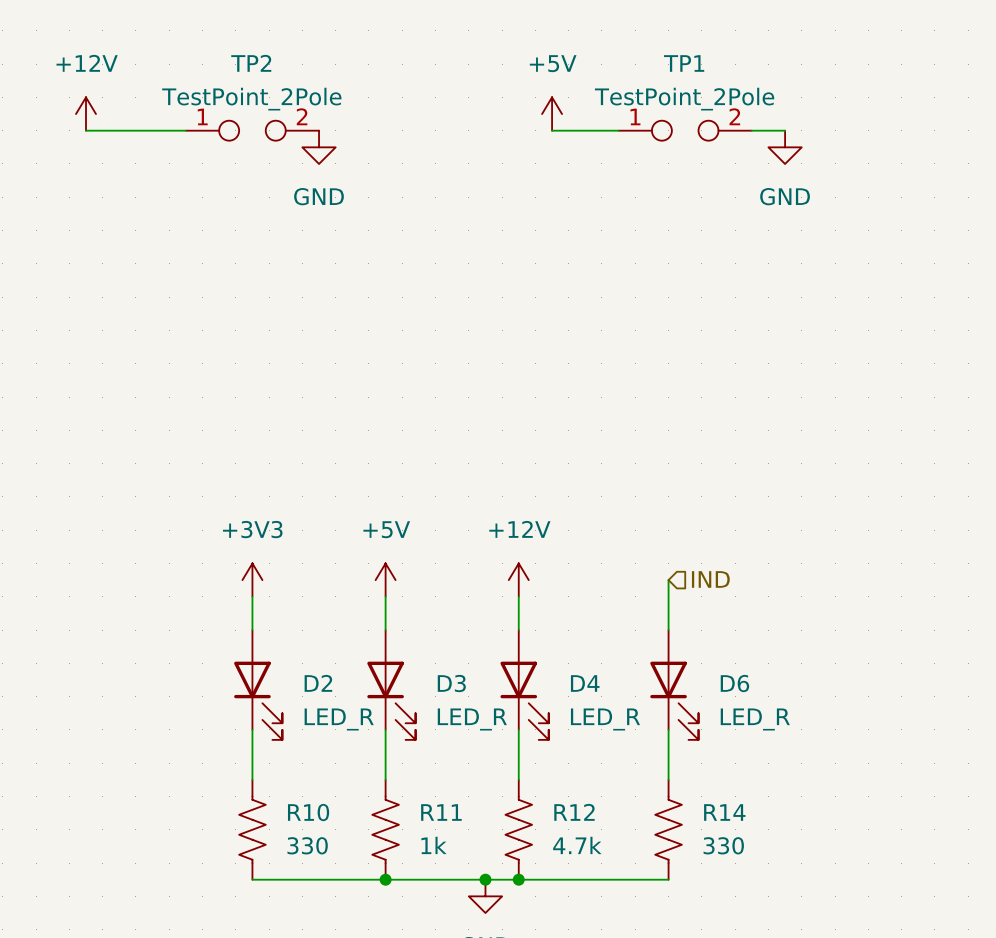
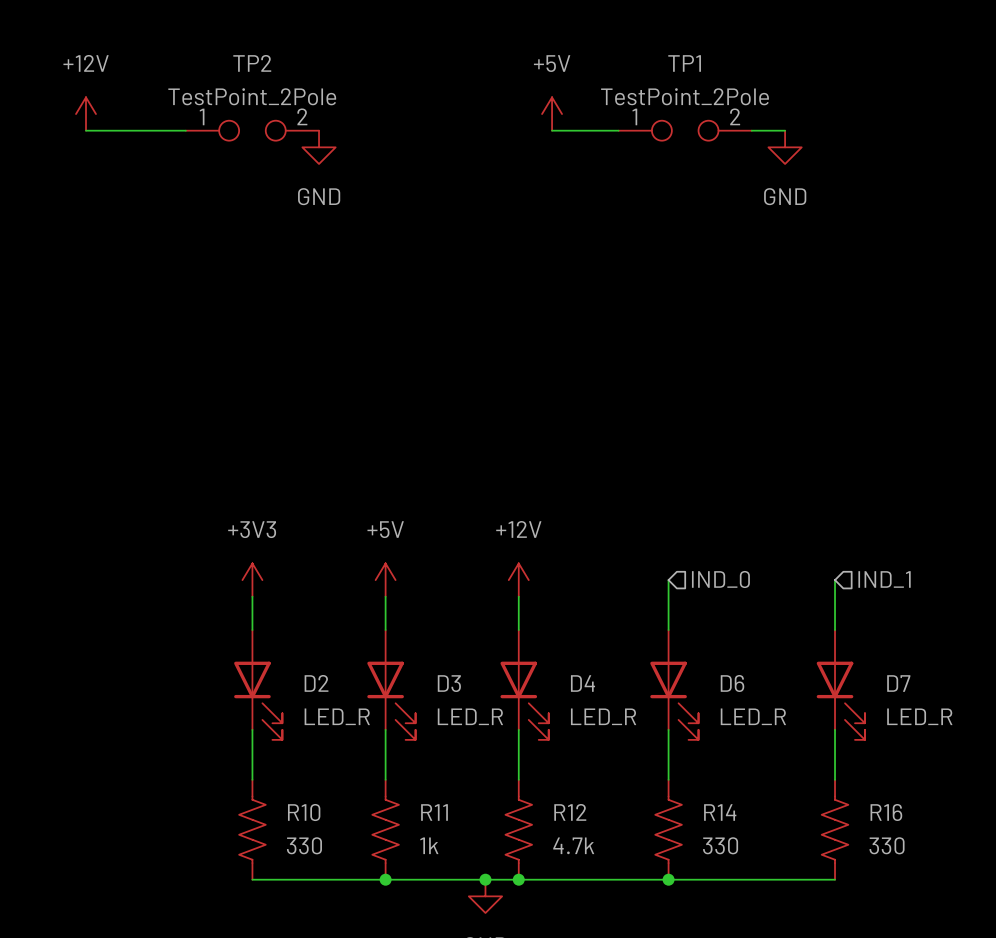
hierarchical label: IND (710, 579) -> IND_0 (720, 579)
wire: none -> (835, 580) (835, 630)
hierarchical label: none -> IND_1 (884, 579)
D7: none -> LED_R (840, 684)
wire: none -> (835, 729) (835, 779)
R16: none -> 330 (835, 829)
wire: none -> (668, 879) (835, 879)
junction: none -> (668, 879)

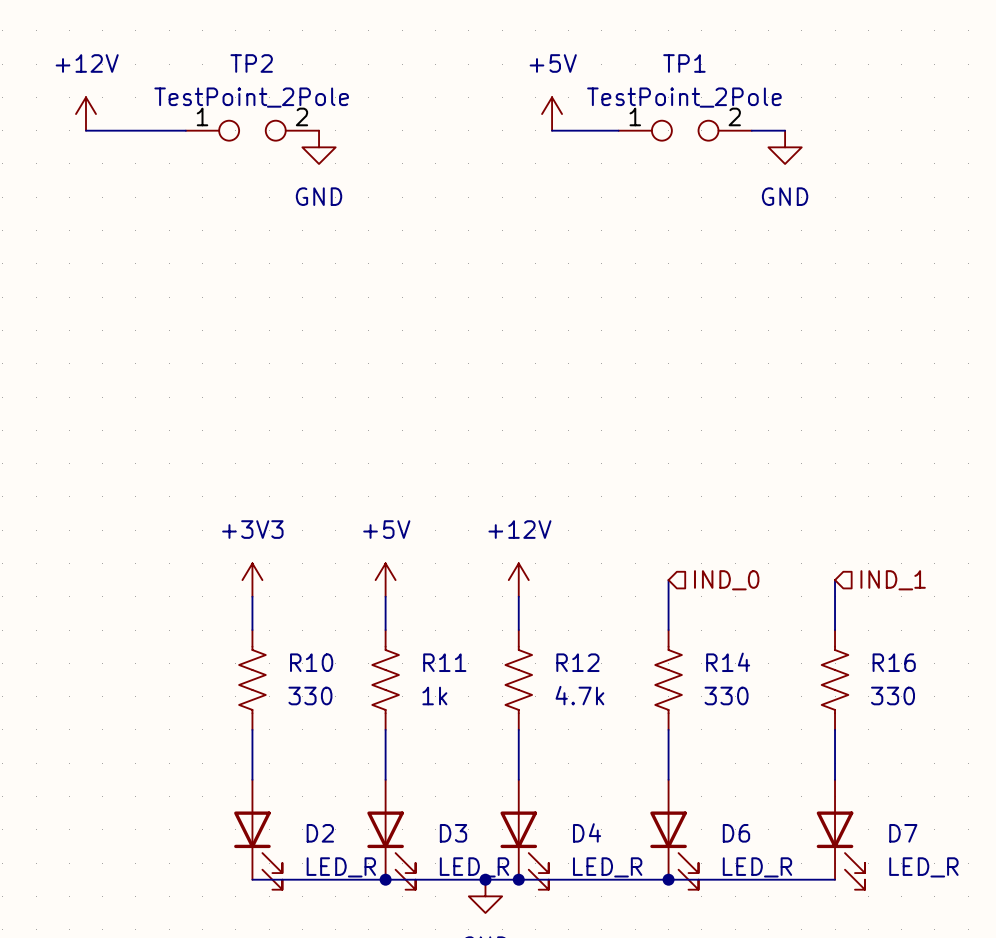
D2 position: (258, 684) -> (258, 834)
D3 position: (391, 684) -> (391, 834)
D4 position: (524, 684) -> (524, 834)
D6 position: (674, 684) -> (674, 834)
D7 position: (840, 684) -> (840, 834)
R10 position: (252, 829) -> (252, 679)
R11 position: (385, 829) -> (385, 679)
R12 position: (518, 829) -> (518, 679)
R14 position: (668, 829) -> (668, 679)
R16 position: (835, 829) -> (835, 679)

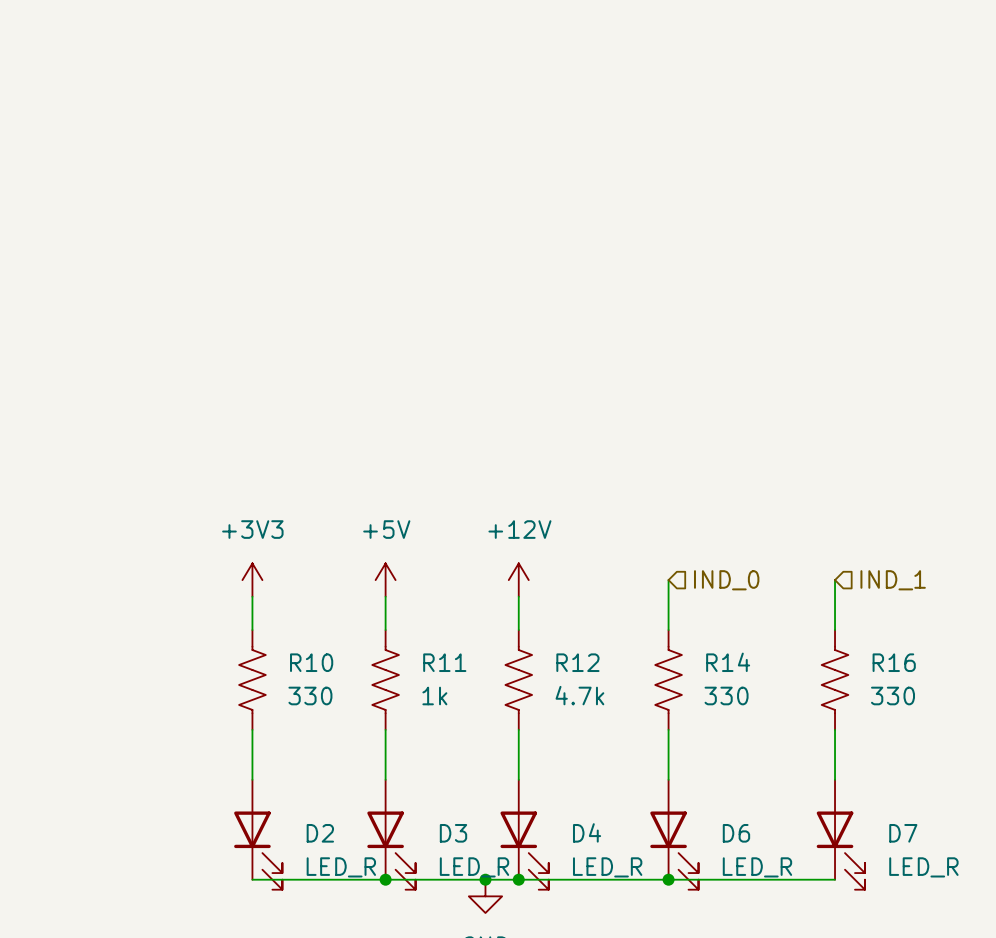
power symbol: +12V (86, 114) -> none
power symbol: +5V (552, 114) -> none
wire: (86, 130) (185, 130) -> none
TP2: TestPoint_2Pole (252, 130) -> none
wire: (552, 130) (618, 130) -> none
TP1: TestPoint_2Pole (685, 130) -> none
wire: (751, 130) (785, 130) -> none
power symbol: GND (319, 147) -> none
power symbol: GND (785, 147) -> none

